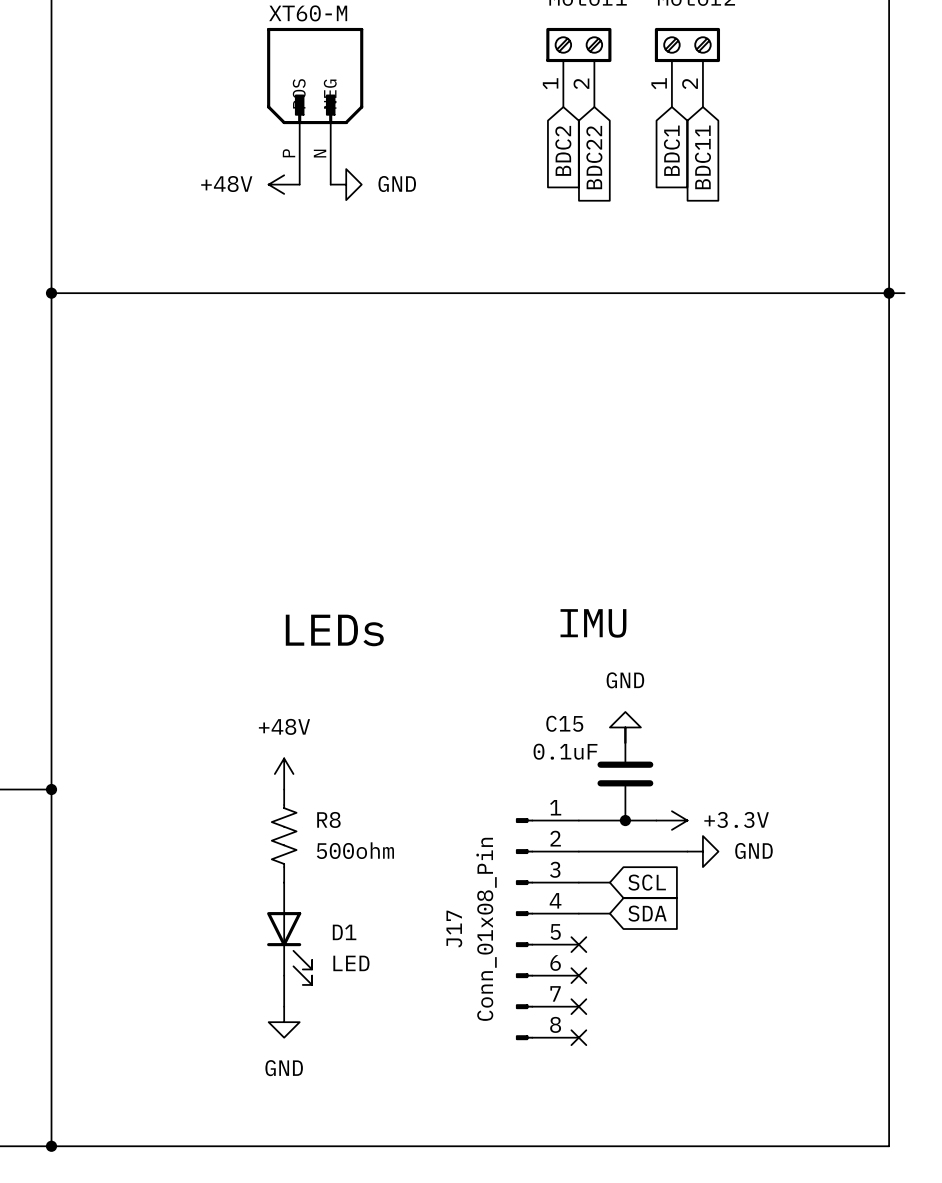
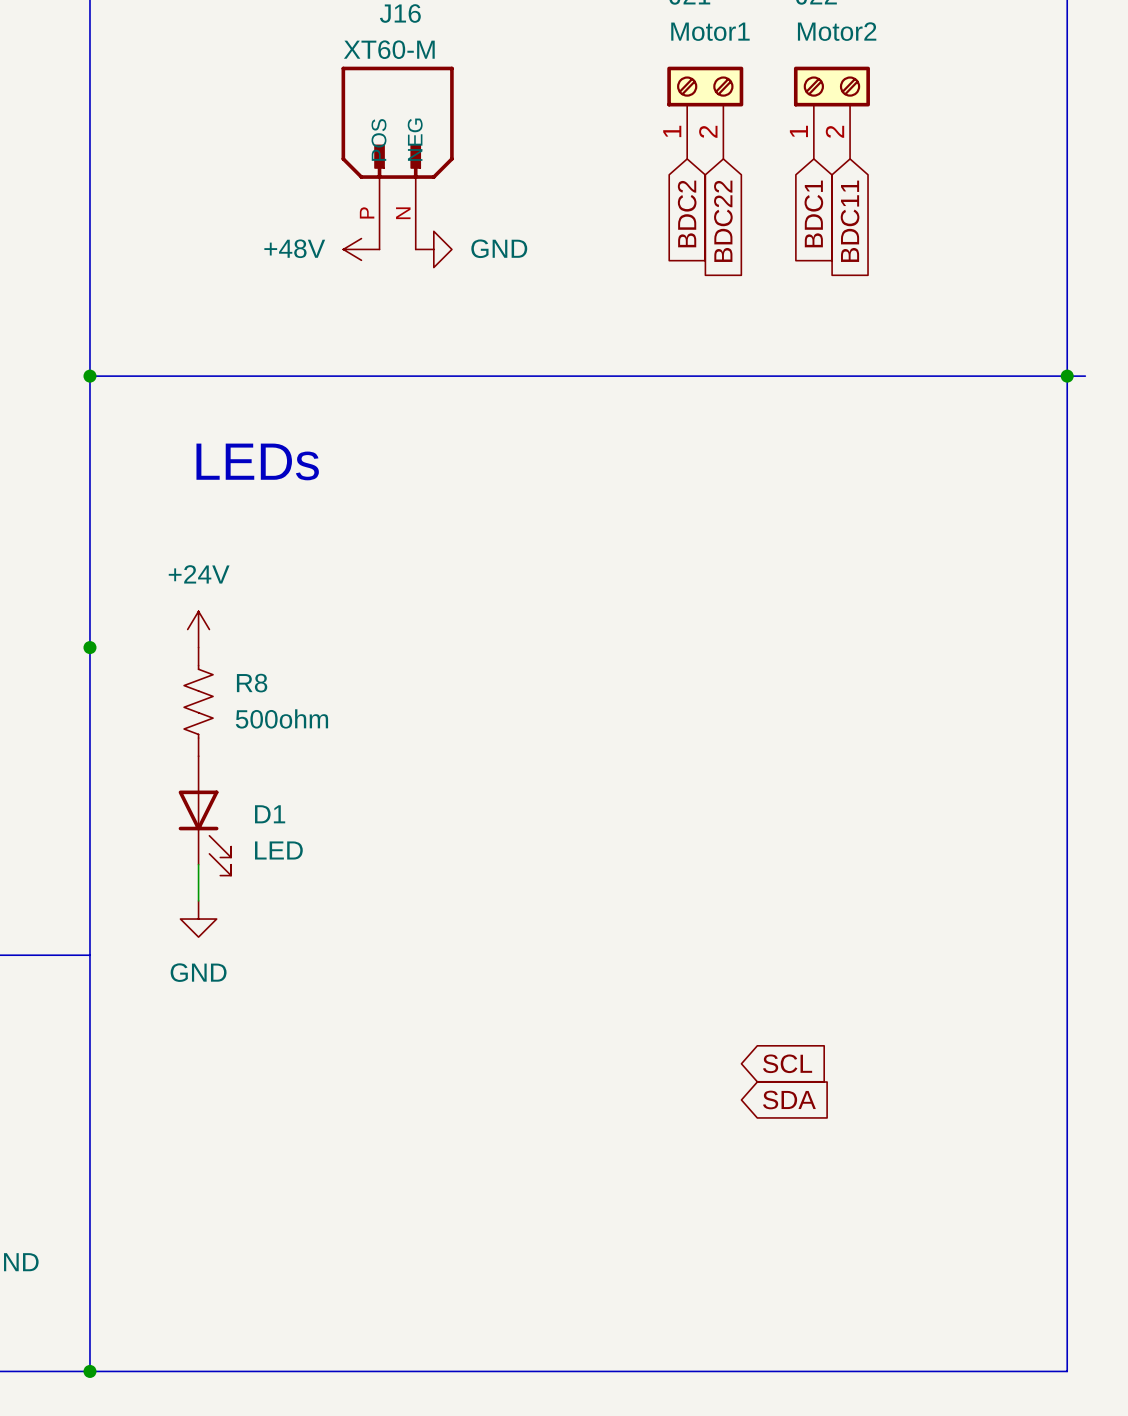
power symbol: none -> +24V (198, 629)
junction: none -> (89, 647)
text: IMU (593, 623) -> none
text position: LEDs (334, 630) -> LEDs (257, 461)
power symbol: GND (625, 727) -> none
power symbol: none -> GND (198, 919)
power symbol: +48V (284, 774) -> none
C15: 0.1uF (625, 774) -> none
junction: (51, 789) -> none
wire: (578, 820) (656, 820) -> none
junction: (625, 820) -> none
power symbol: +3.3V (671, 820) -> none
R8 position: (284, 836) -> (198, 701)
wire: (578, 851) (687, 851) -> none
power symbol: GND (702, 851) -> none
wire: (578, 882) (609, 882) -> none
wire: (578, 913) (609, 913) -> none
J17: Conn_01x08_Pin (547, 929) -> none
D1 position: (289, 933) -> (204, 815)
no-connect mark: (578, 944) -> none
wire: (284, 975) (284, 1006) -> (198, 864) (198, 900)
no-connect mark: (578, 975) -> none
no-connect mark: (578, 1006) -> none
power symbol: GND (284, 1022) -> none
no-connect mark: (578, 1037) -> none

